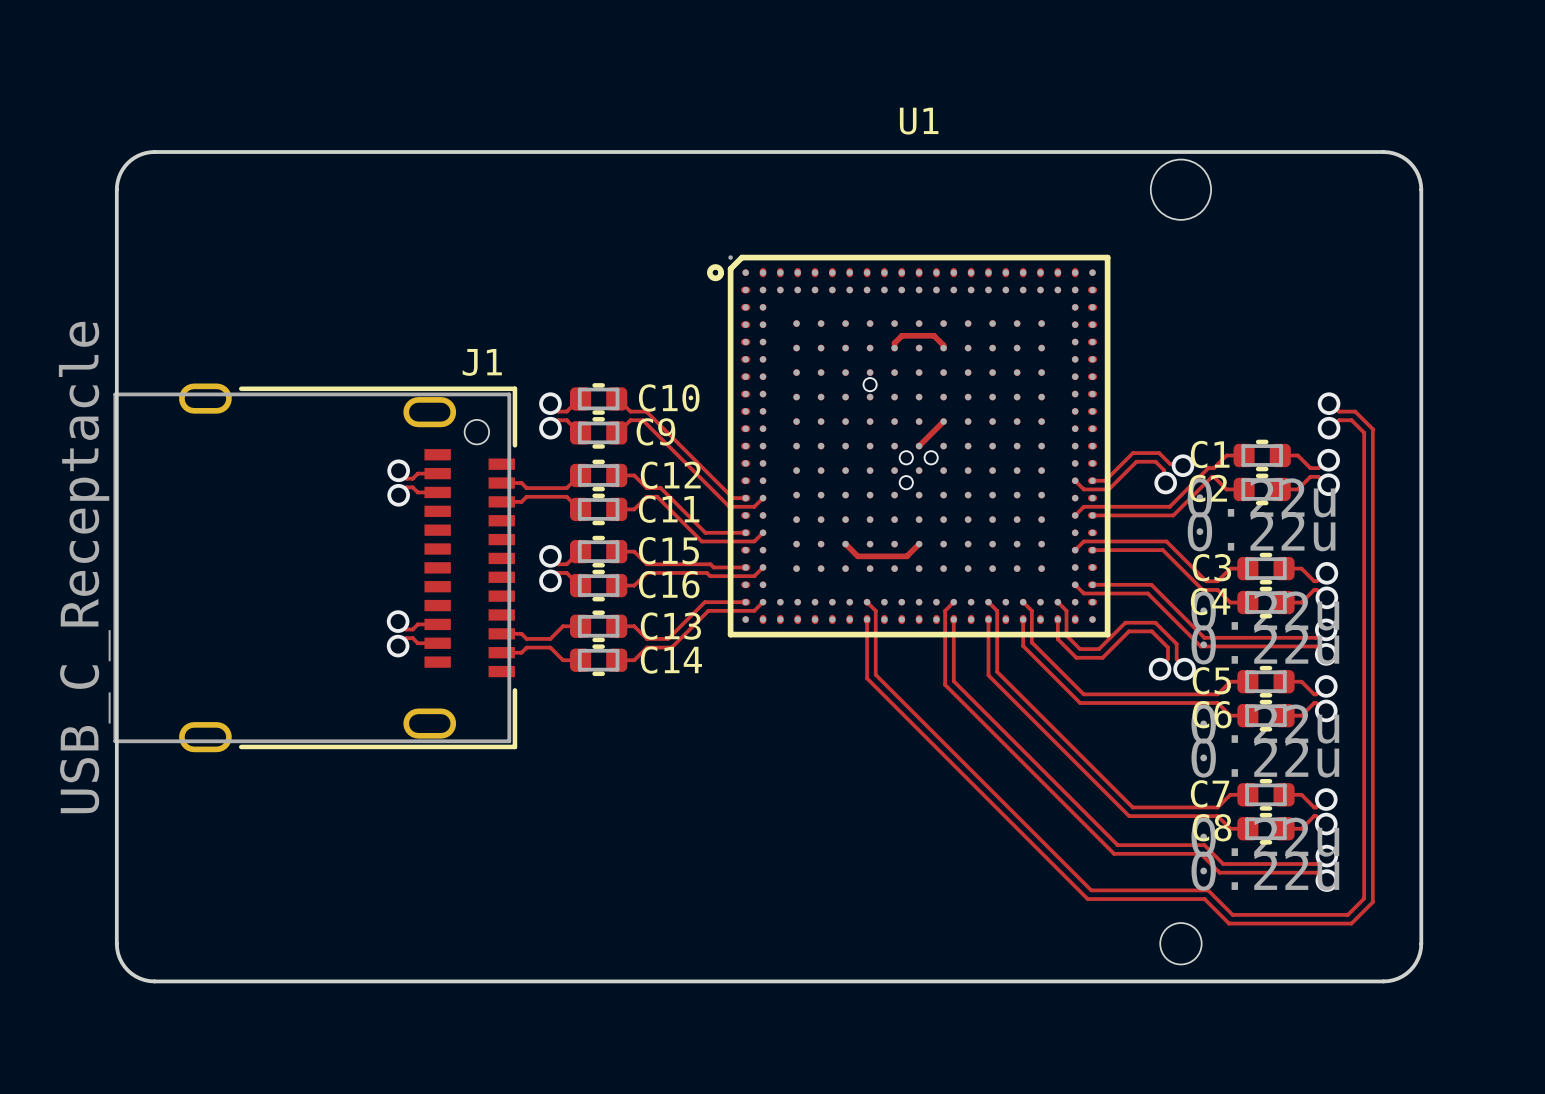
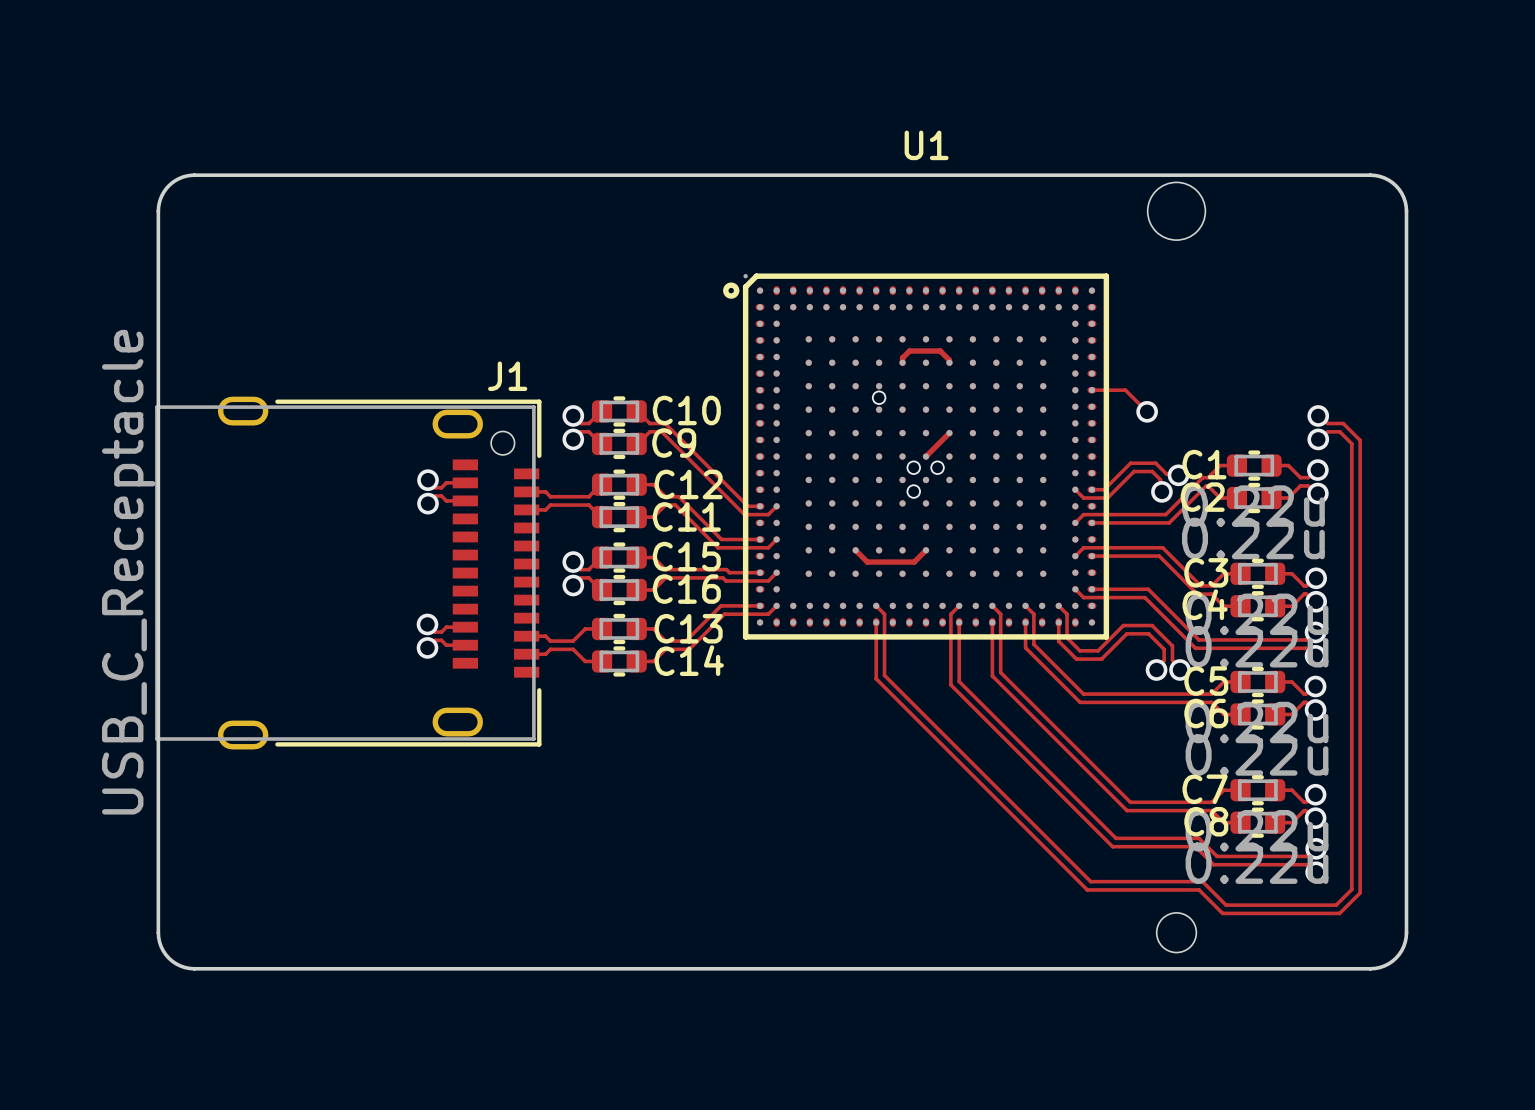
track: none -> (1091, 390) (1125, 390) (1147, 411)
via: none -> (1147, 411)

